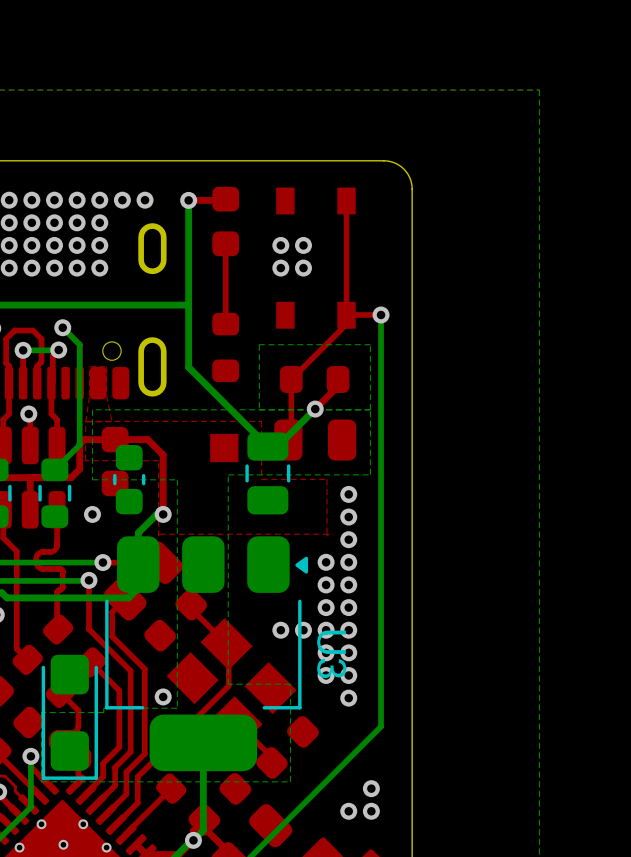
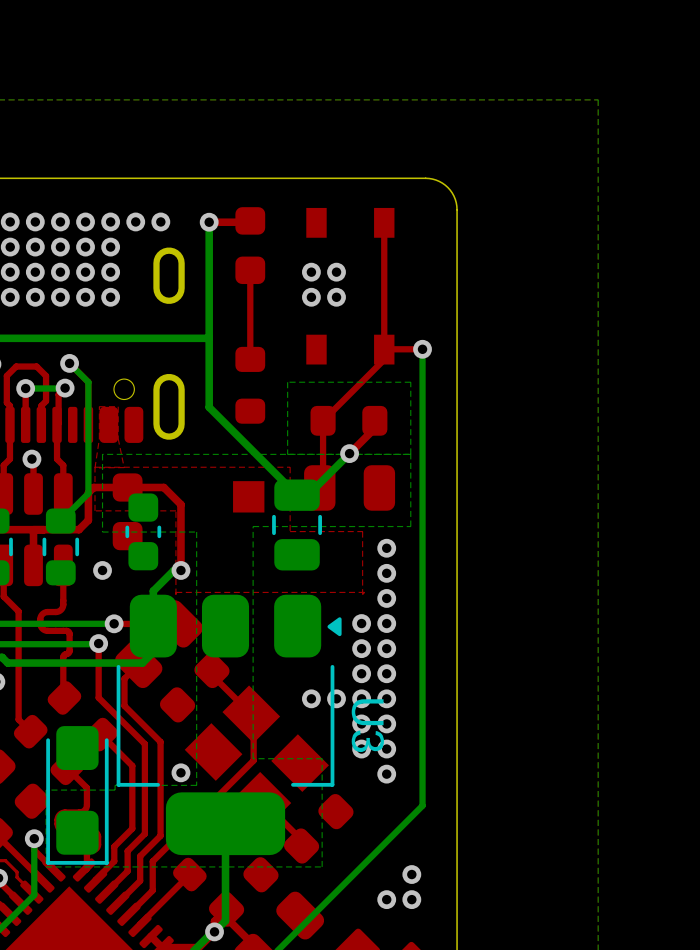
via: (41, 824) -> none
via: (83, 824) -> none
via: (63, 844) -> none
via: (19, 847) -> none
via: (106, 847) -> none

